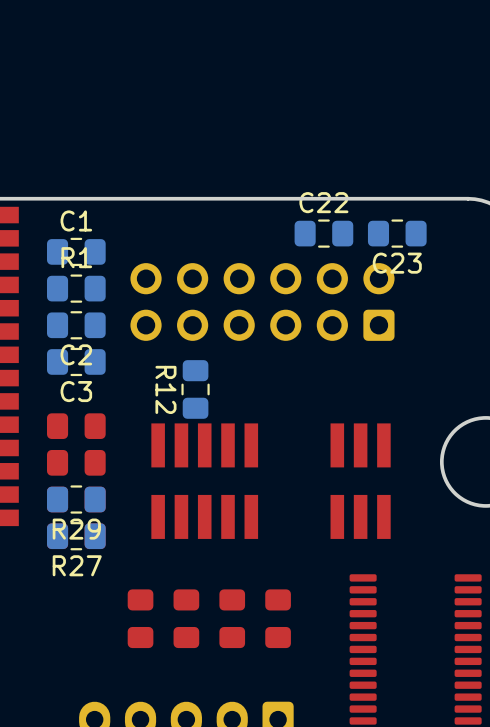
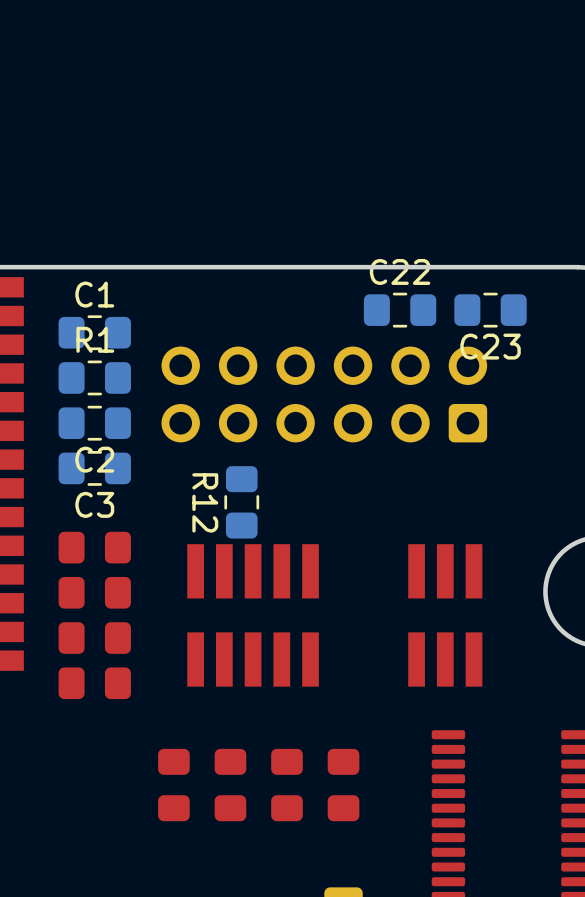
R29: (76, 499) -> none
R27: (76, 536) -> none

